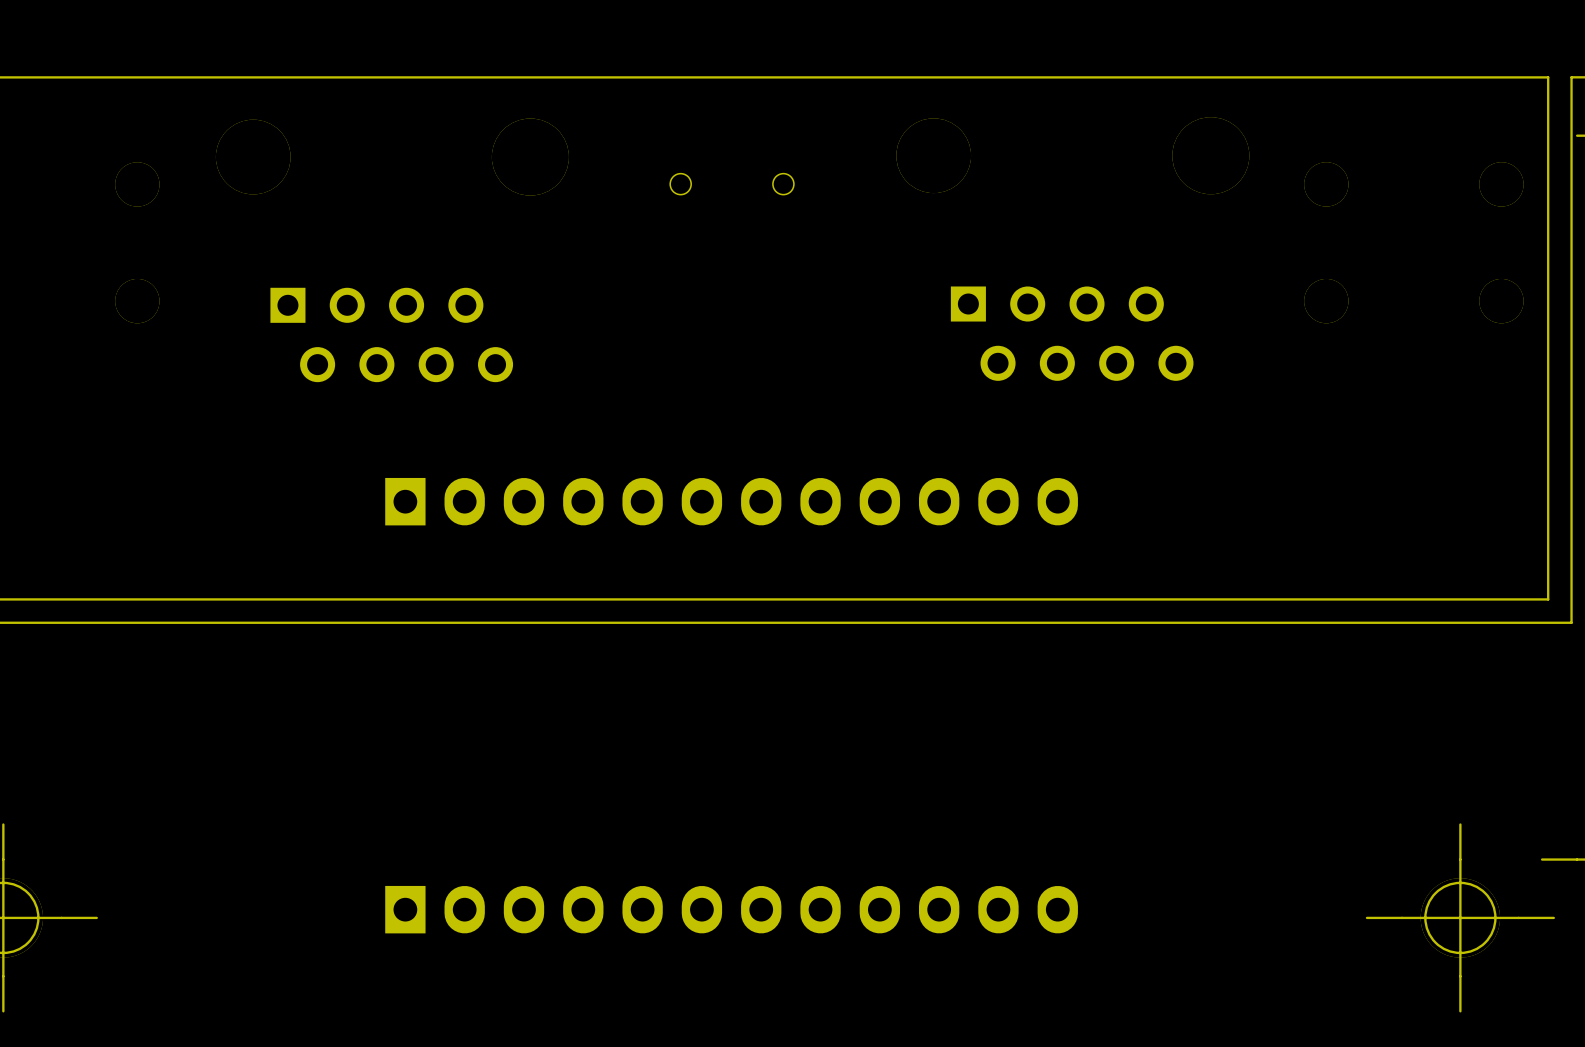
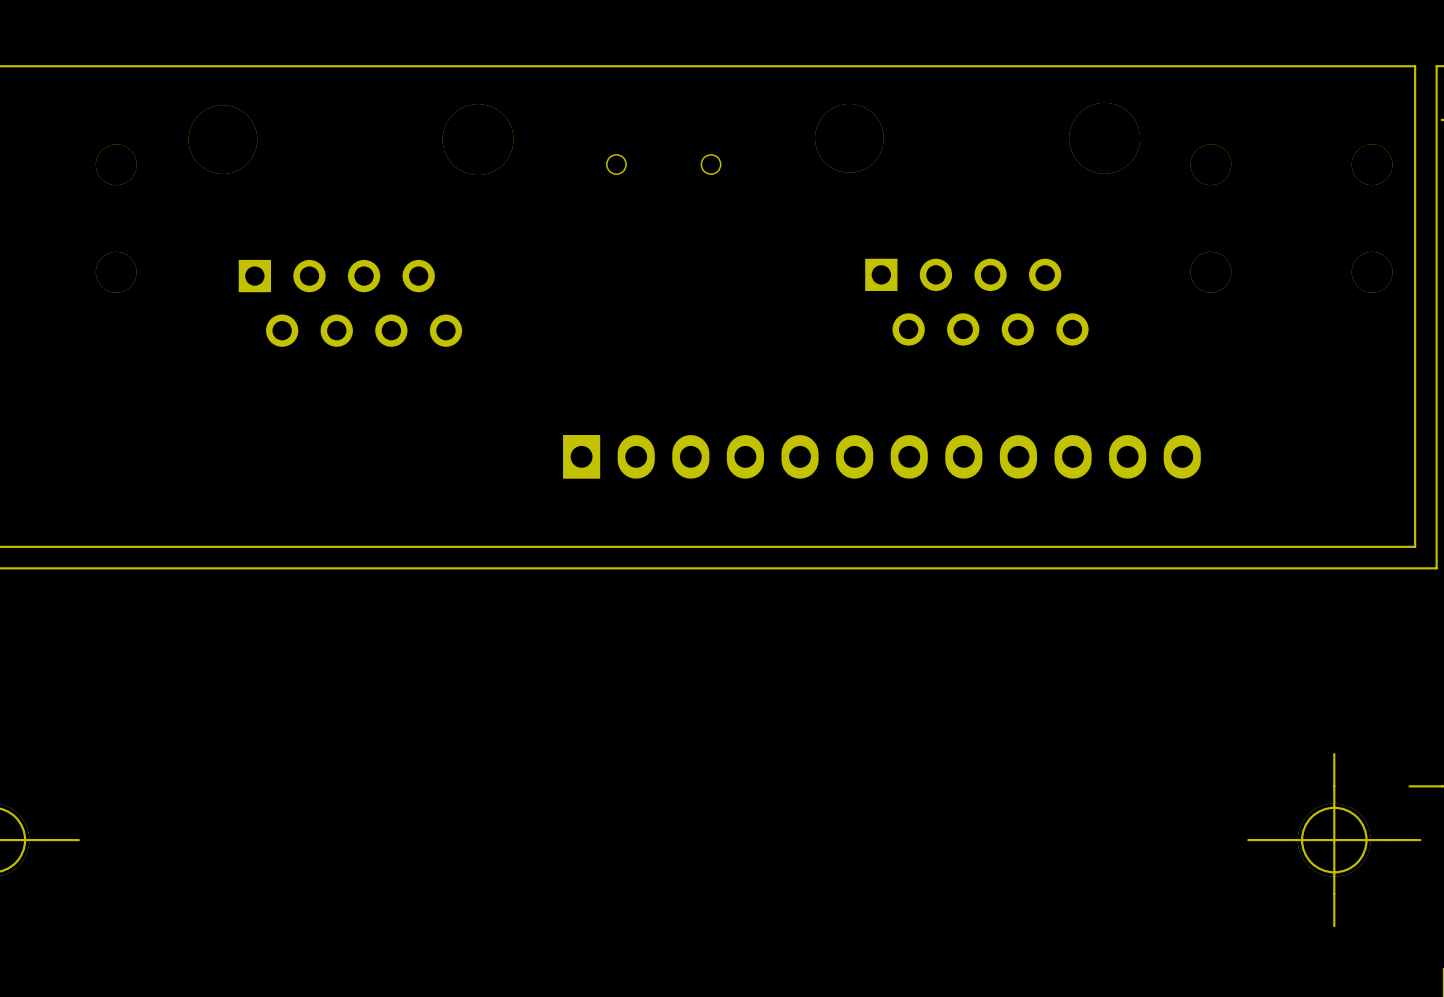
part: (731, 501) -> none
part: none -> (881, 456)
part: (731, 909) -> none

